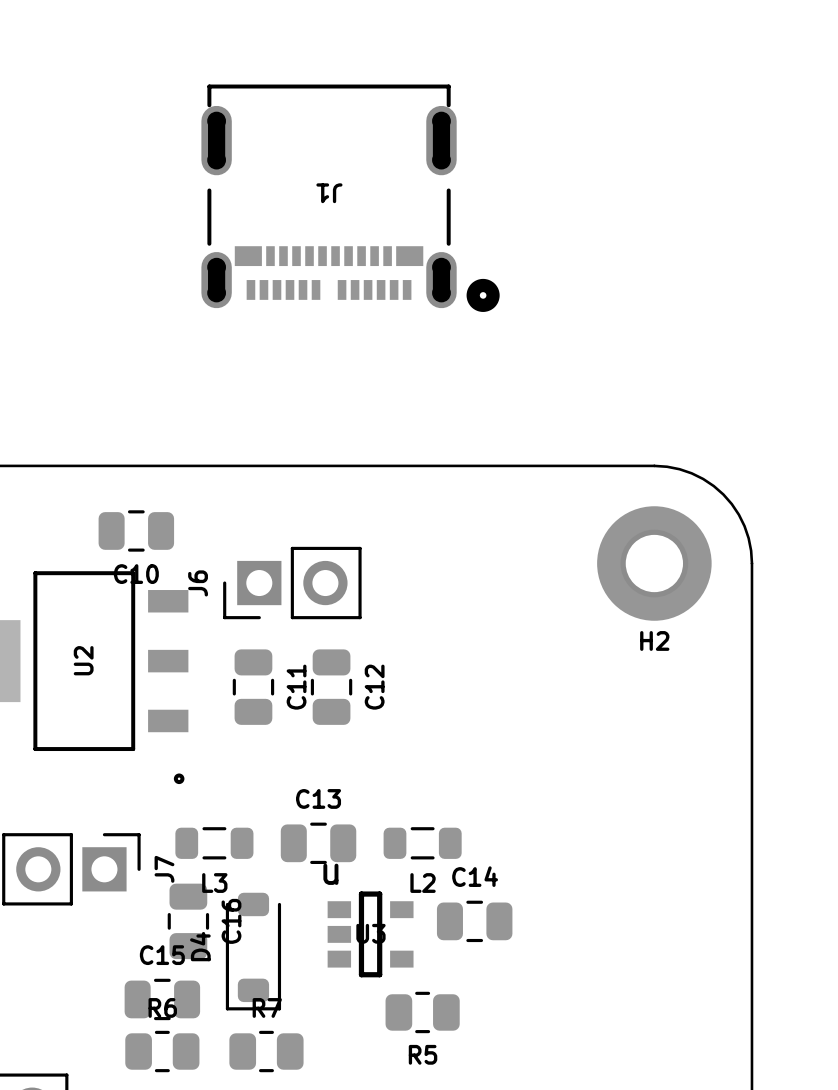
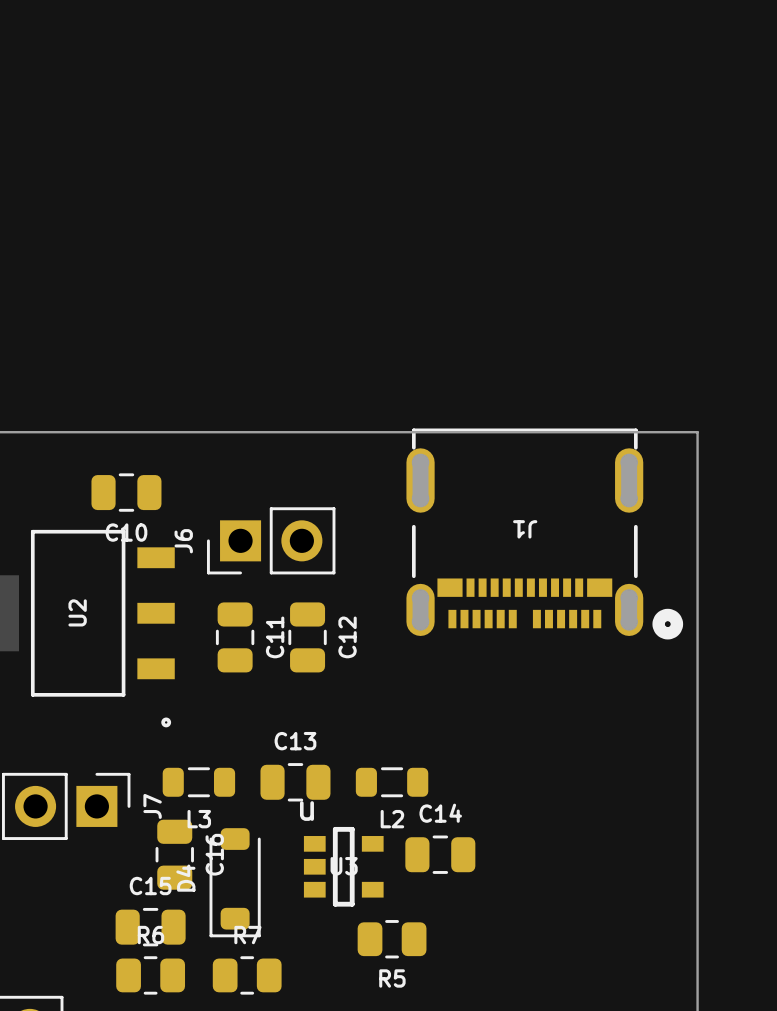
J1 position: (350, 198) -> (544, 533)
board edge: (654, 465) (667, 466) (691, 473) (713, 486) (723, 494) (731, 504) (744, 526) (748, 538) (751, 563) -> (607, 432) (697, 432) (697, 522)
H2: (654, 563) -> none

